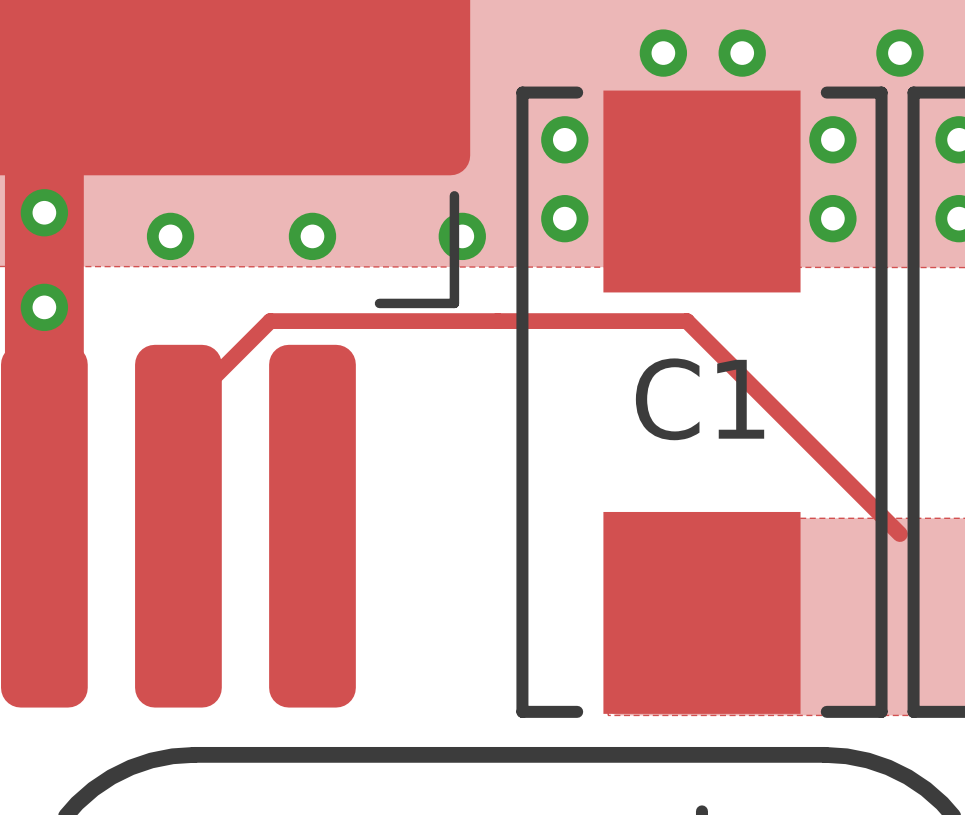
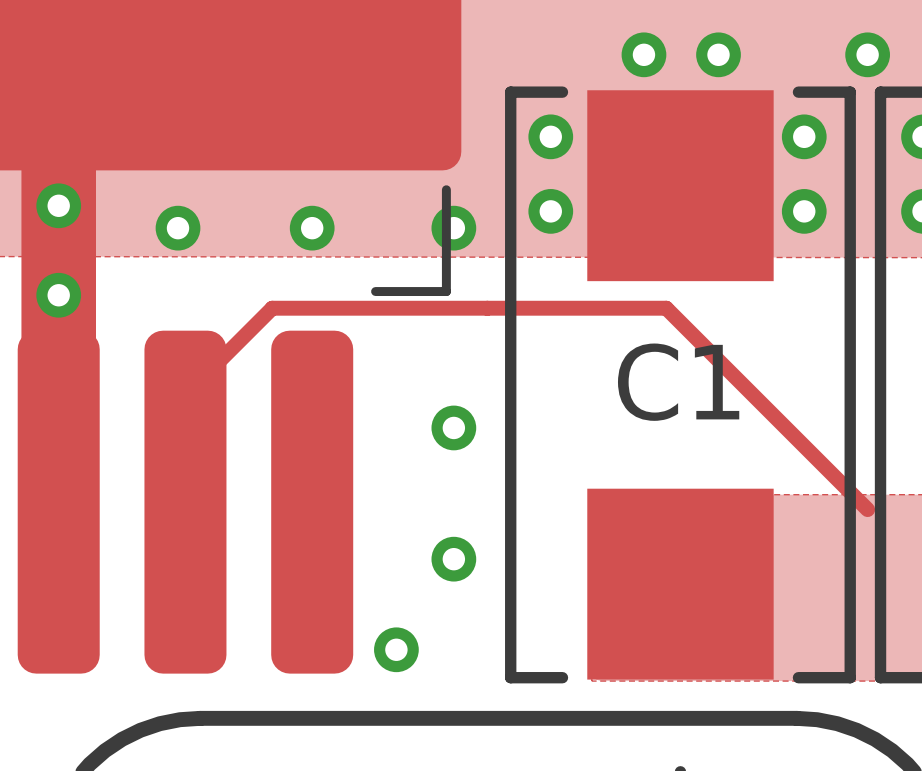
via: none -> (453, 427)
via: none -> (453, 559)
via: none -> (396, 649)

